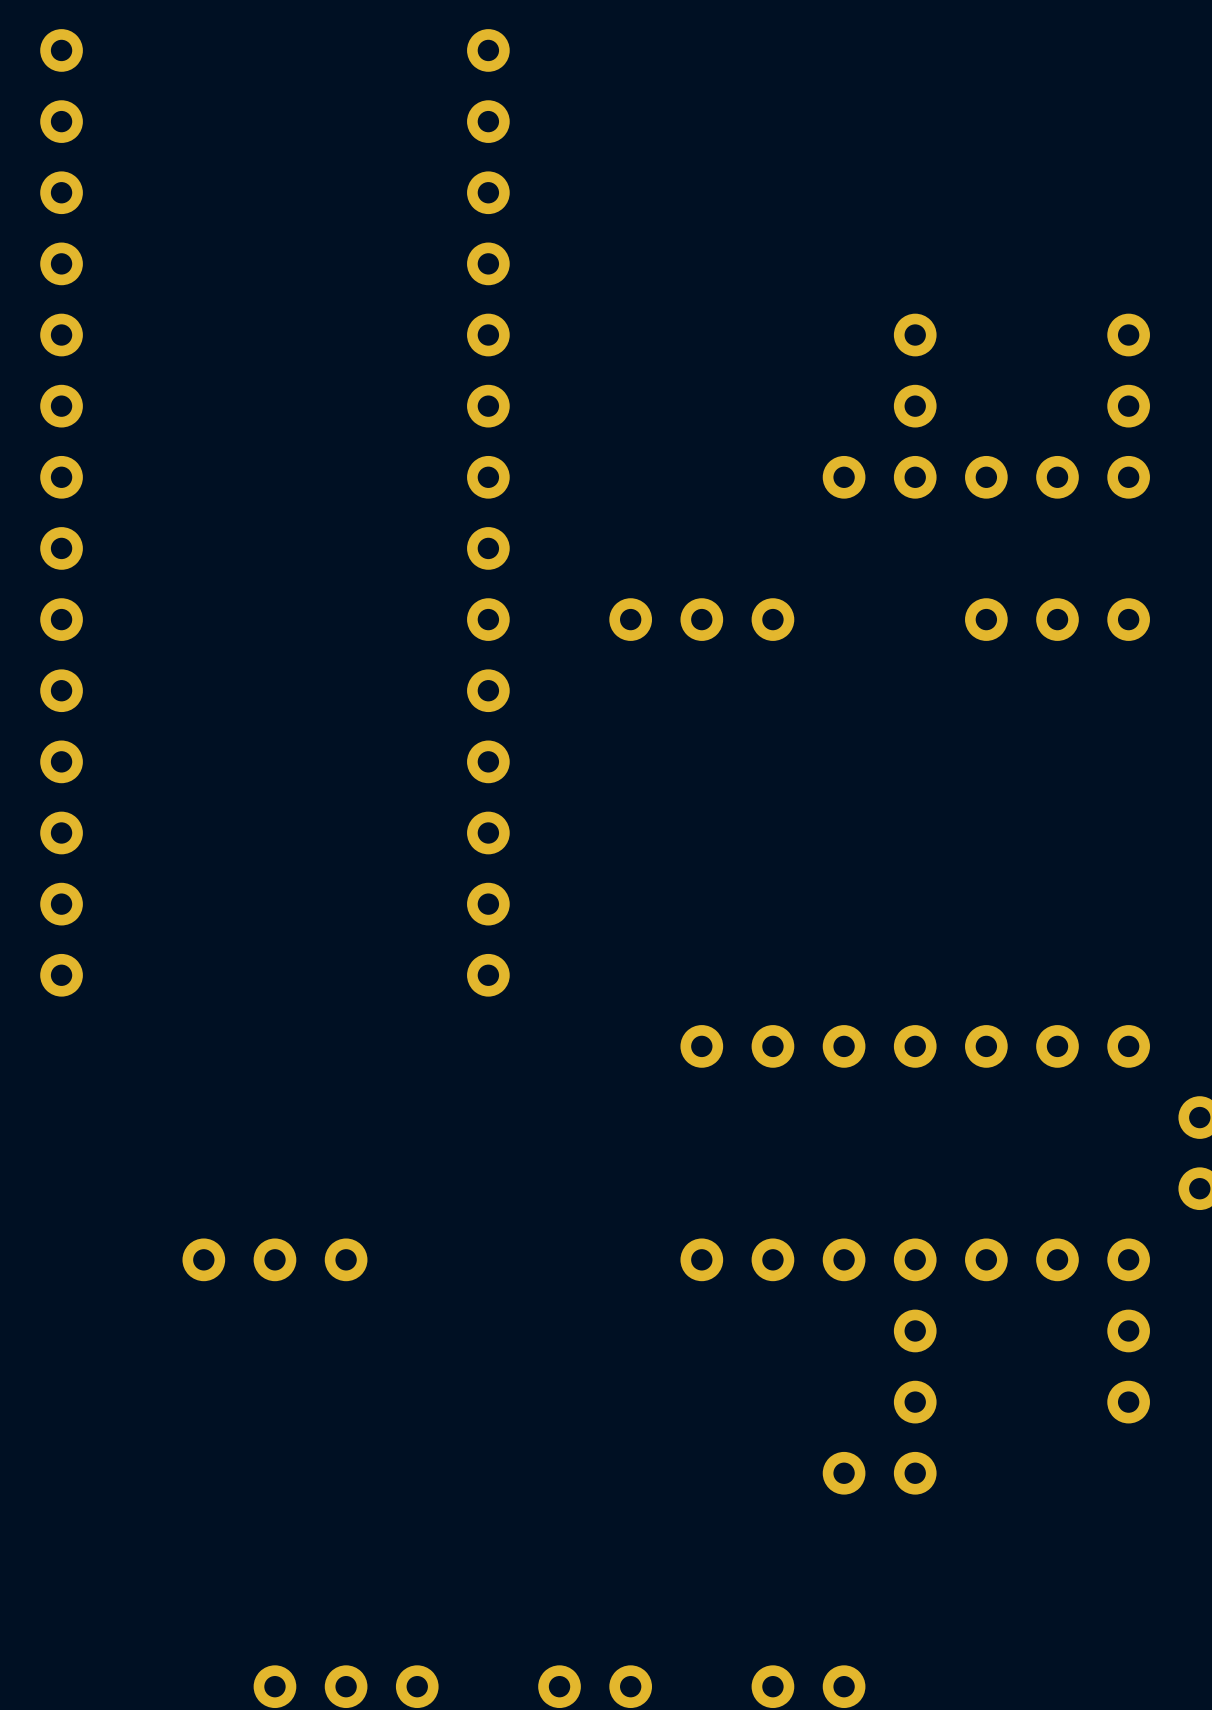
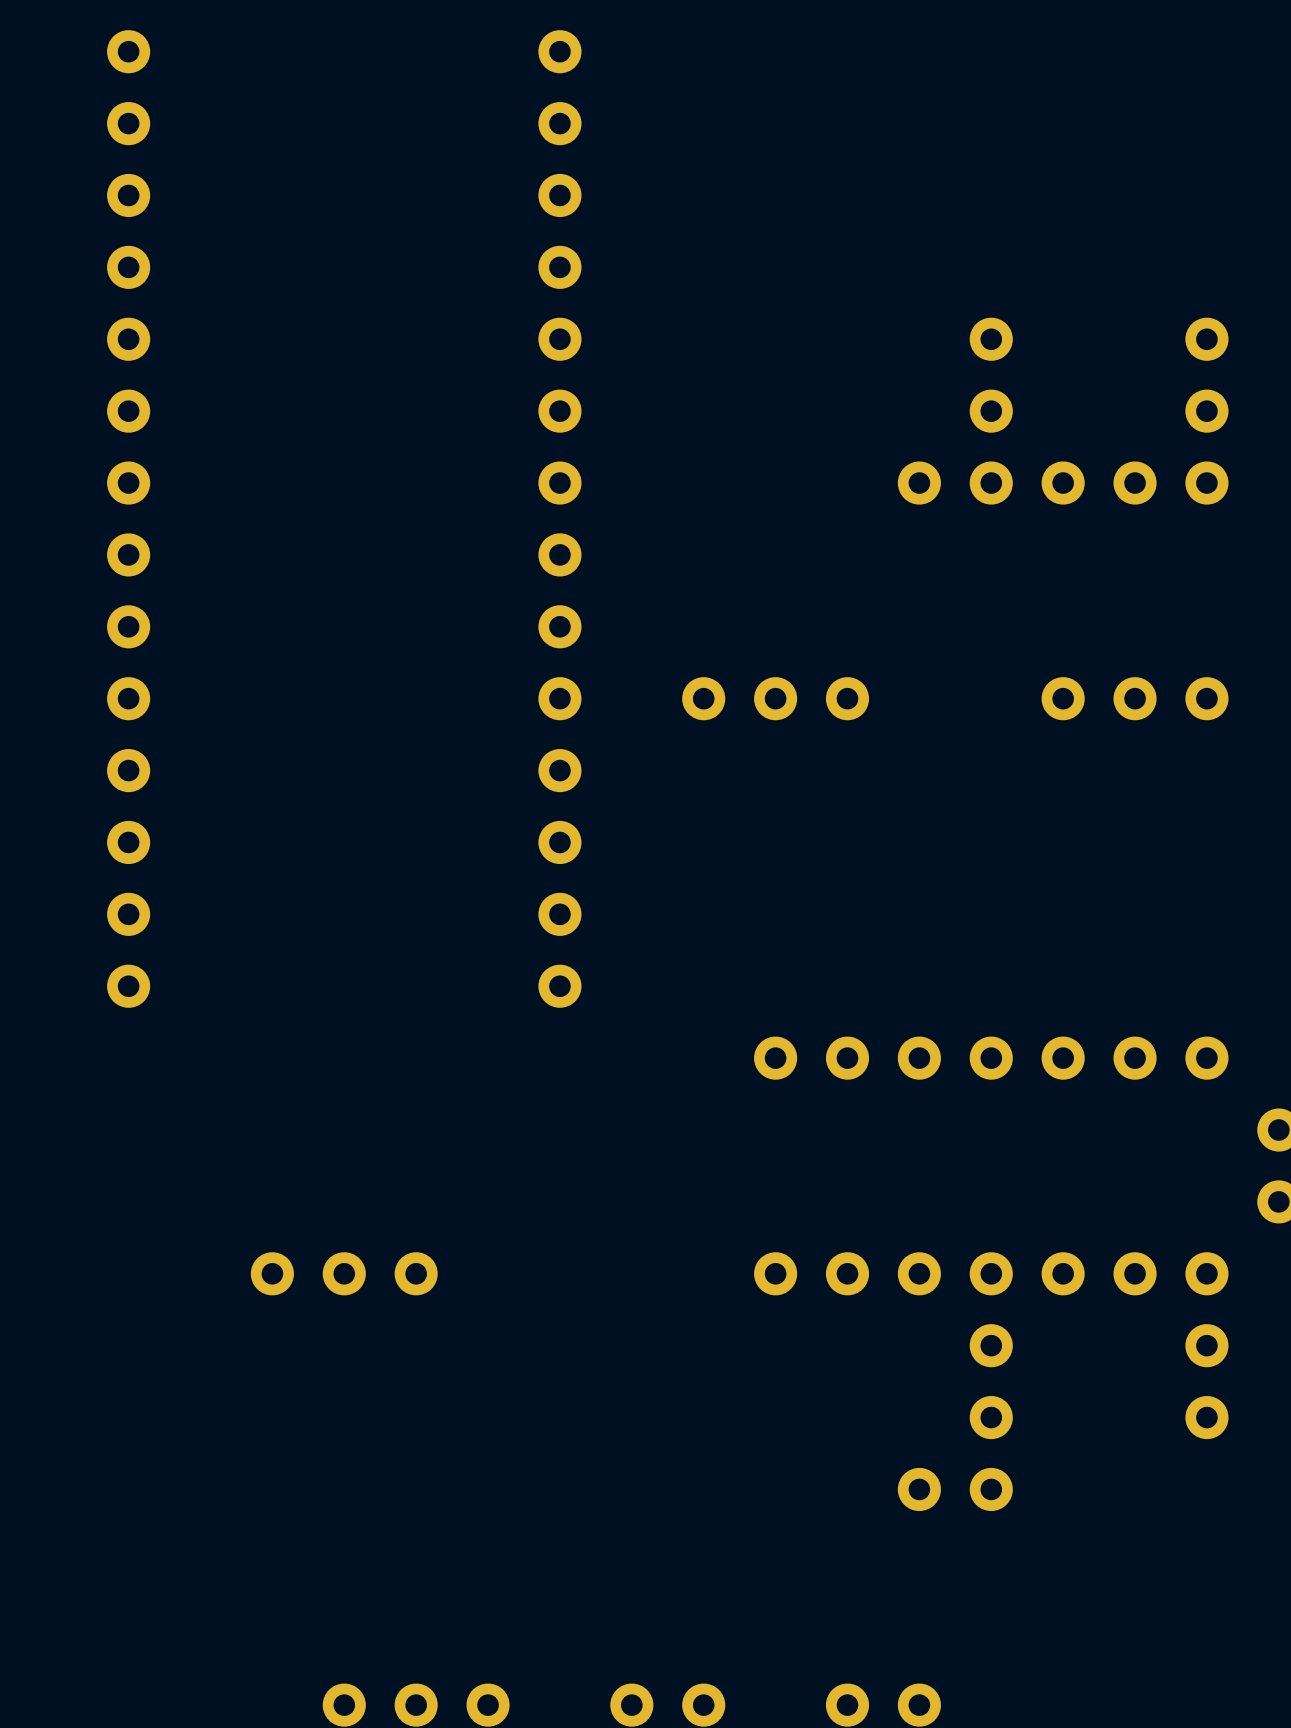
part position: (701, 619) -> (775, 698)
part position: (1057, 619) -> (1135, 698)

